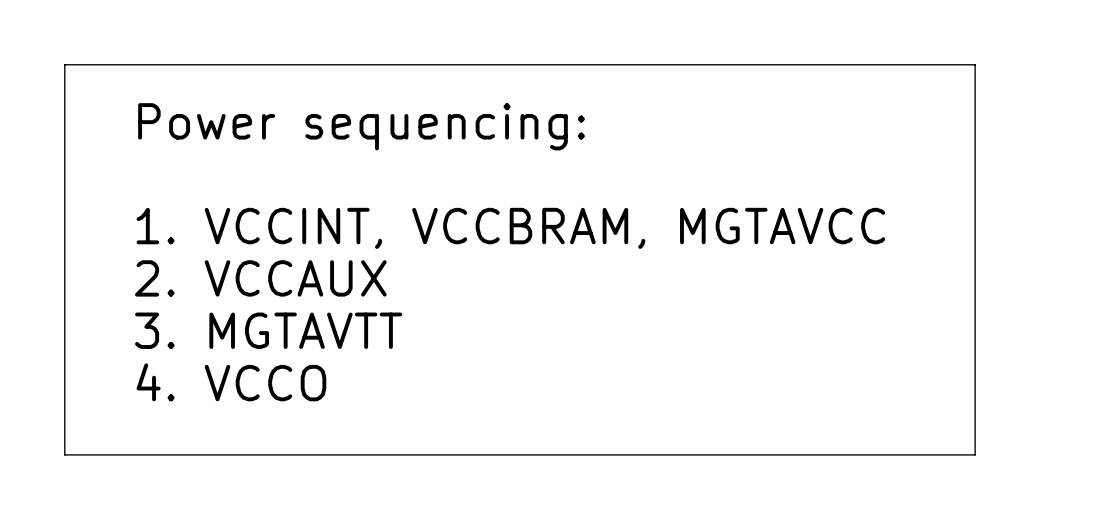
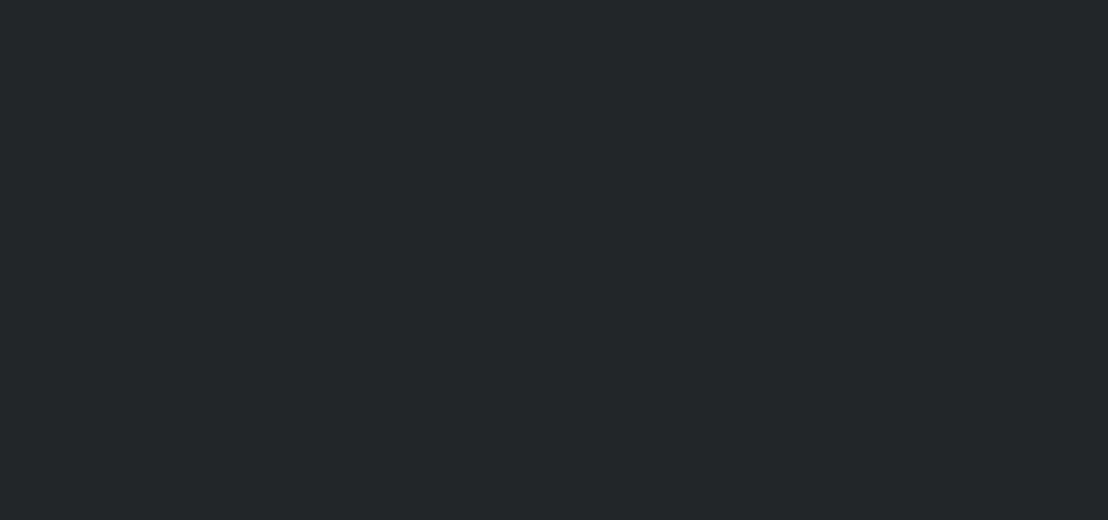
line: (64, 64) (975, 64) (975, 454) (64, 454) (64, 64) -> none
text: Power sequencing: (361, 126) -> none
text: 1. VCCINT, VCCBRAM, MGTAVCC (510, 228) -> none
text: 2. VCCAUX (260, 278) -> none
text: 3. MGTAVTT (268, 330) -> none
text: 4. VCCO (231, 382) -> none

